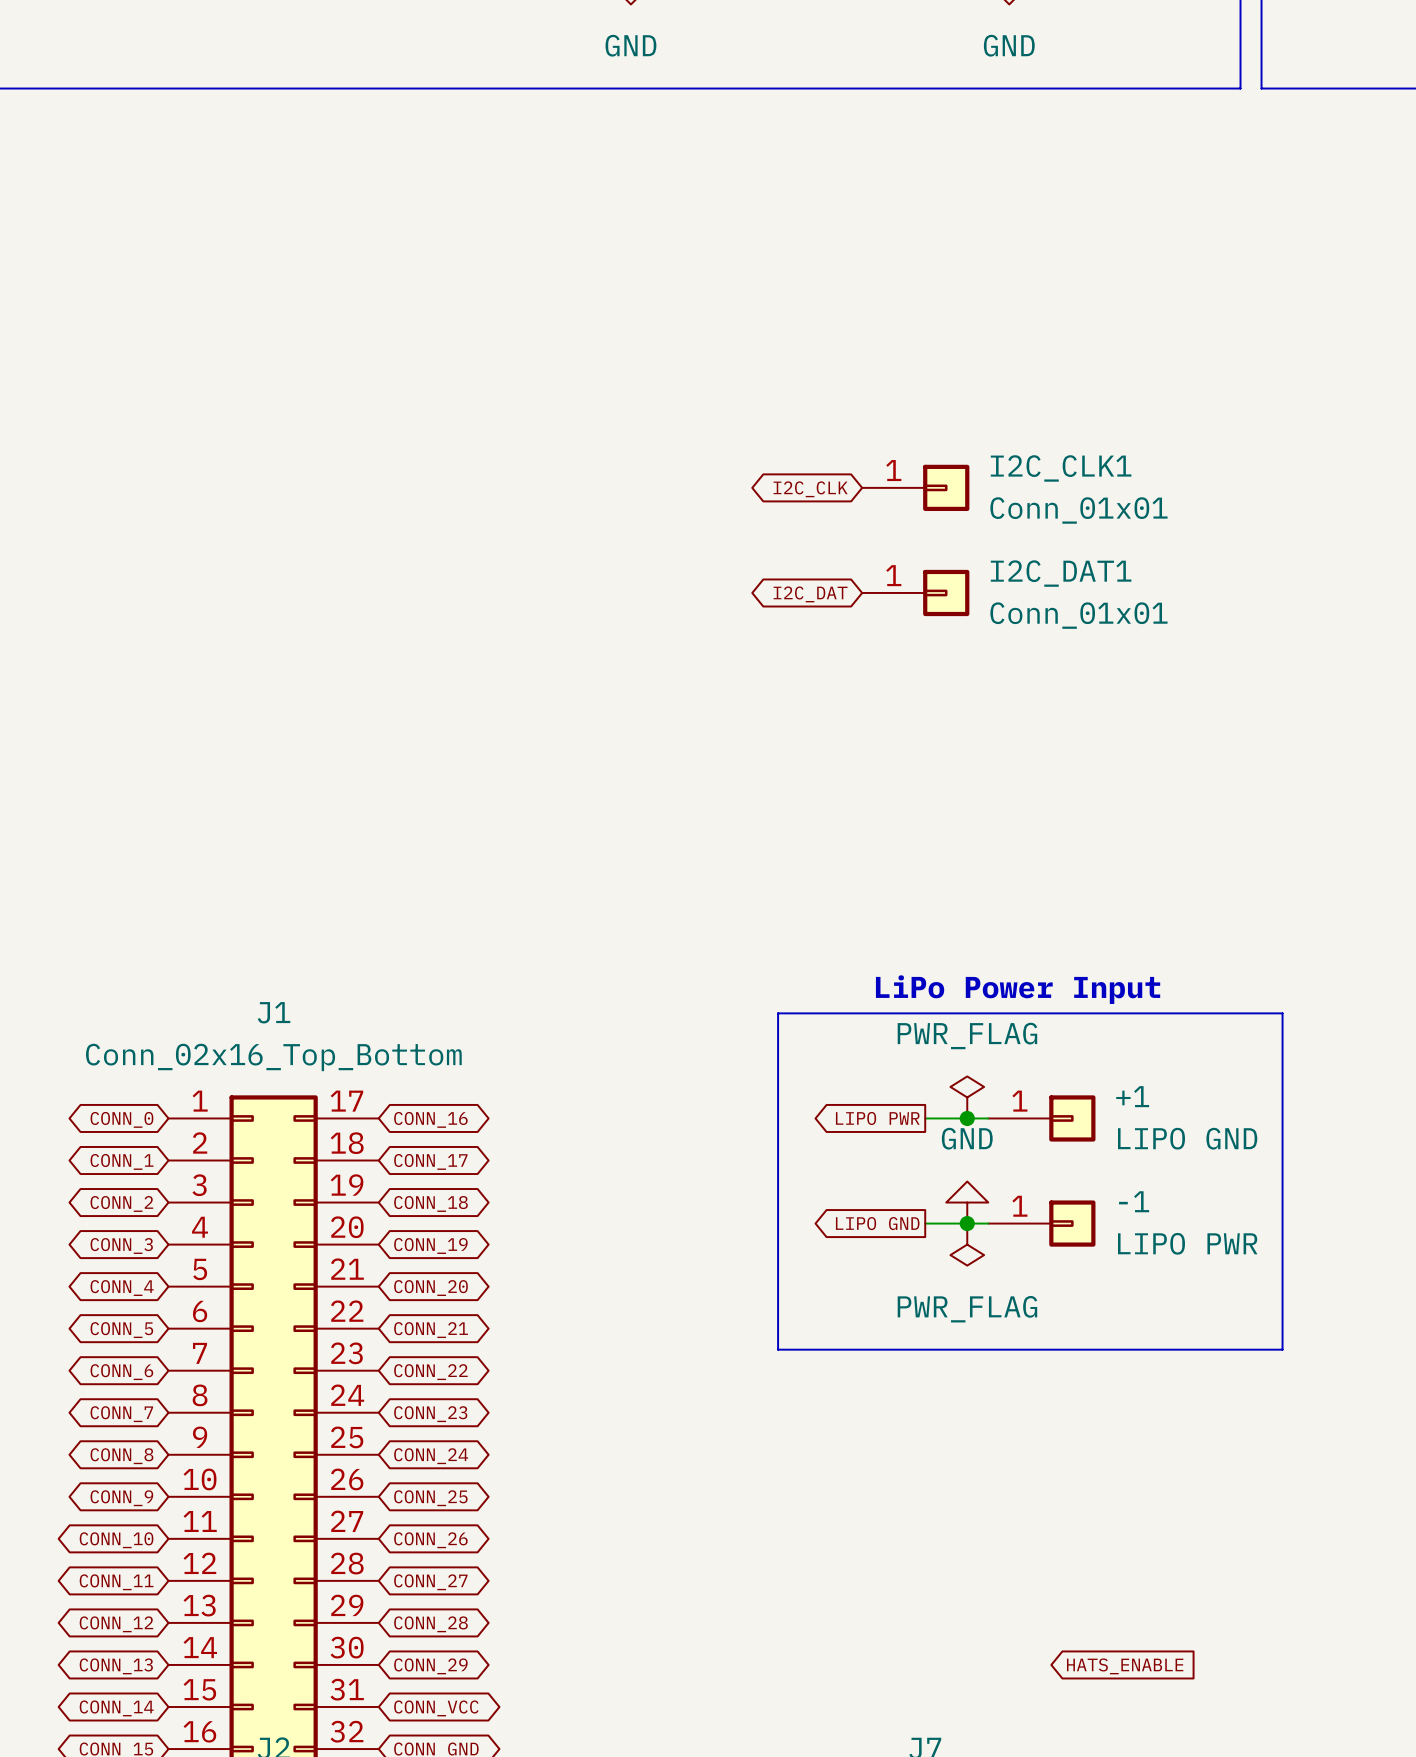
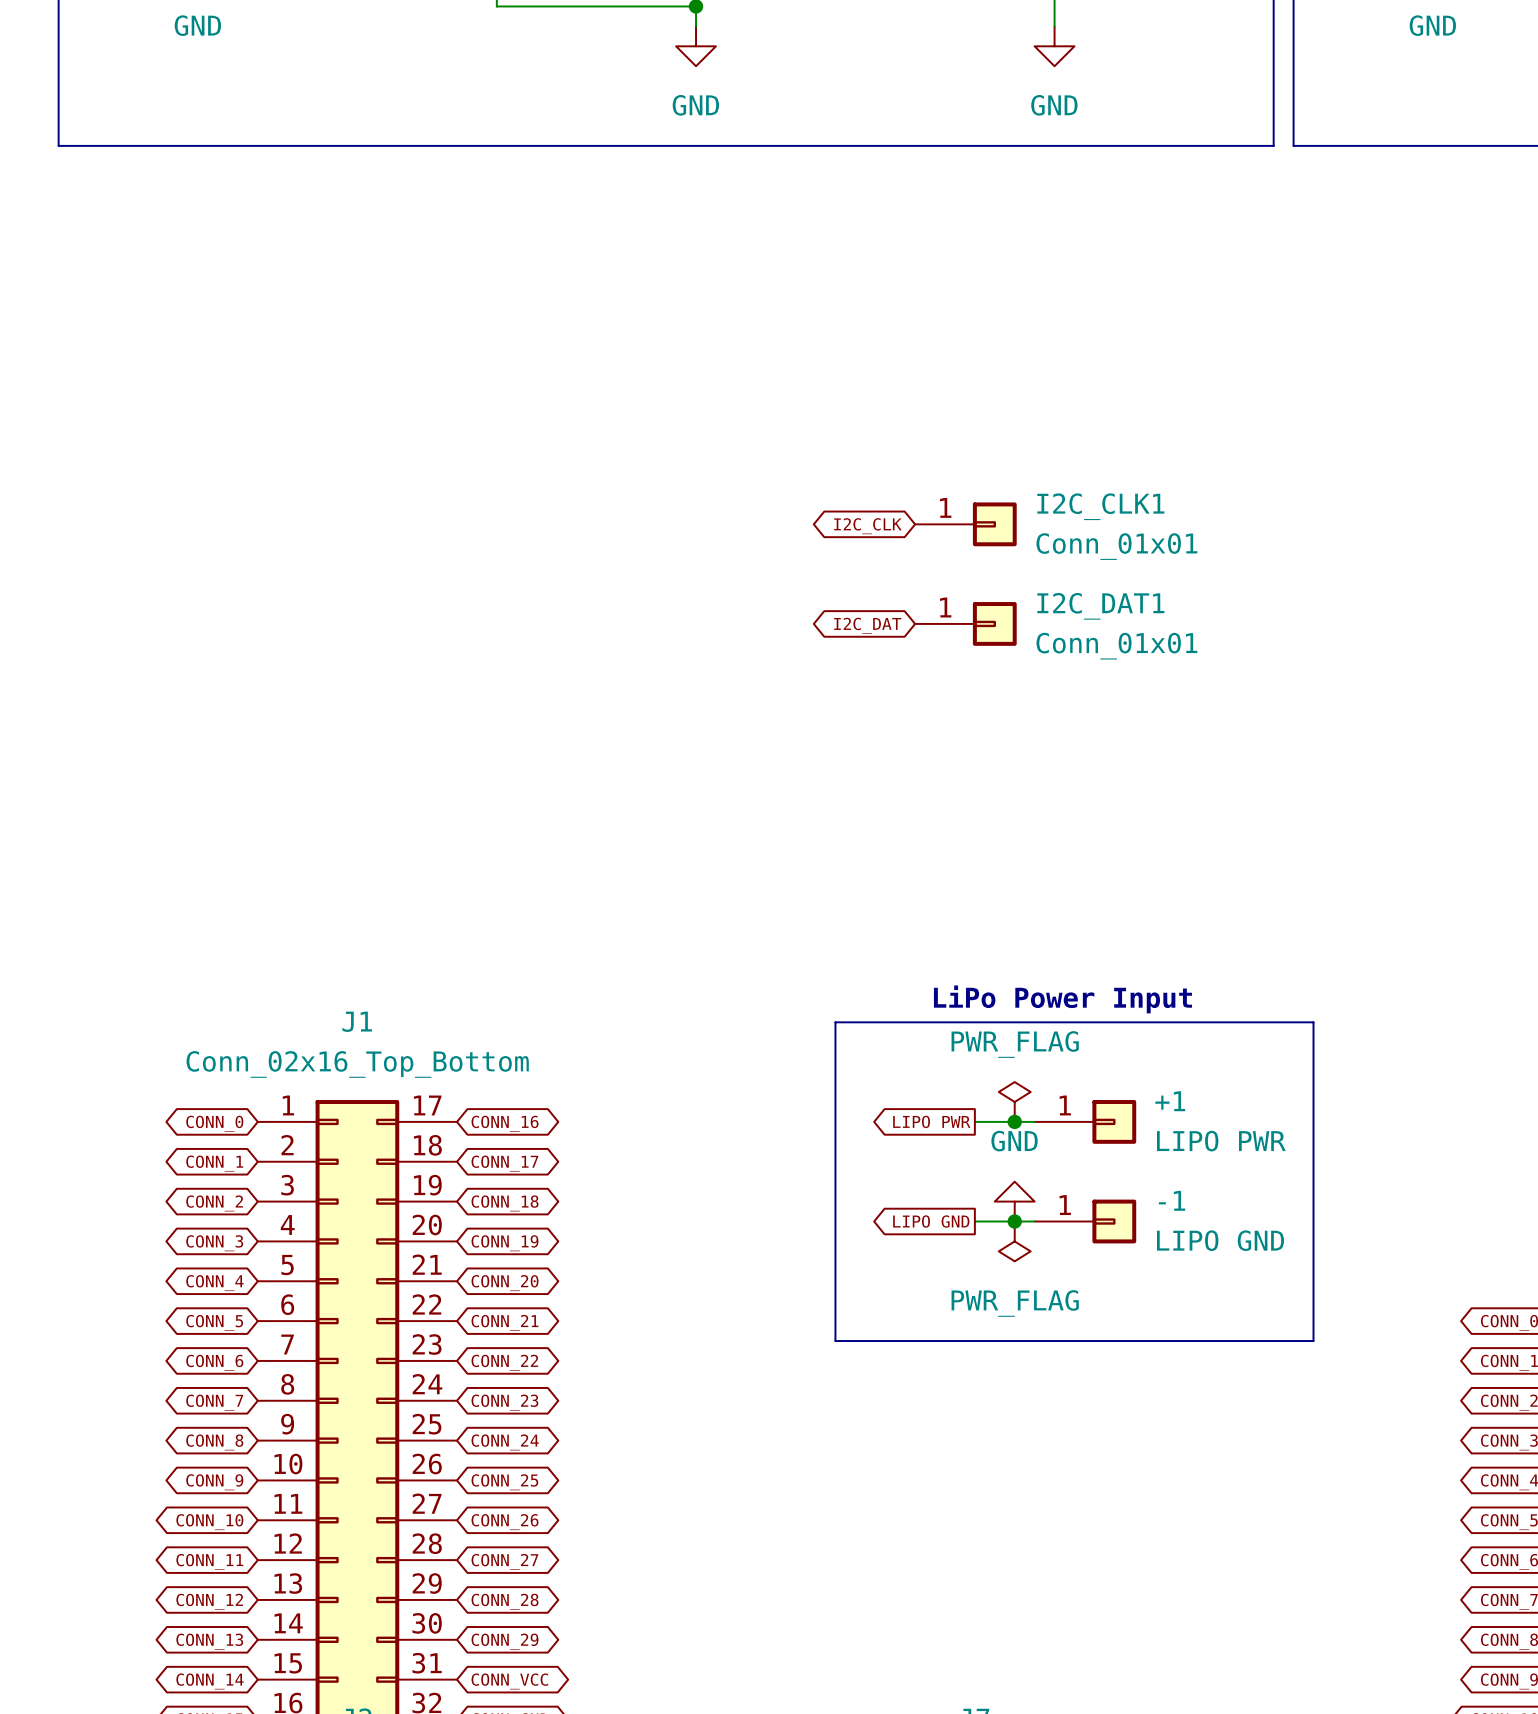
+1 value: LIPO GND (1187, 1138) -> LIPO PWR (1221, 1141)
-1 value: LIPO PWR (1187, 1243) -> LIPO GND (1220, 1240)
global label: HATS_ENABLE (1125, 1666) -> none

